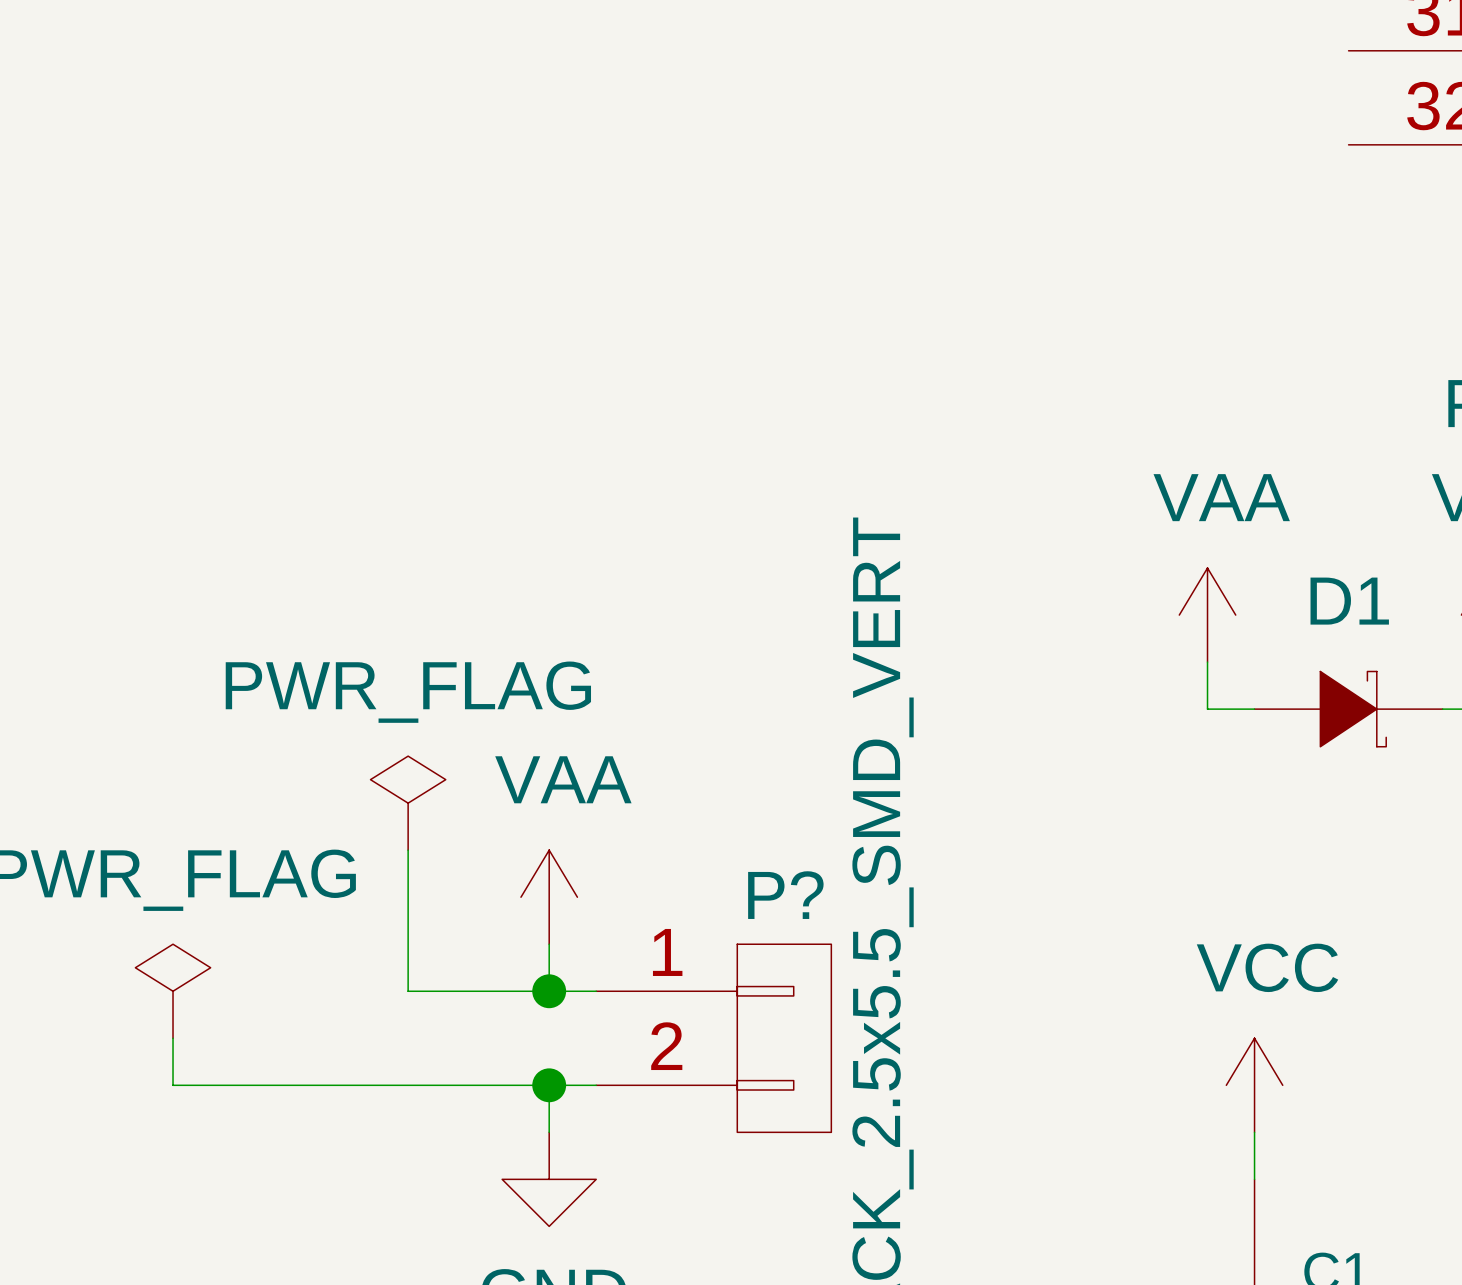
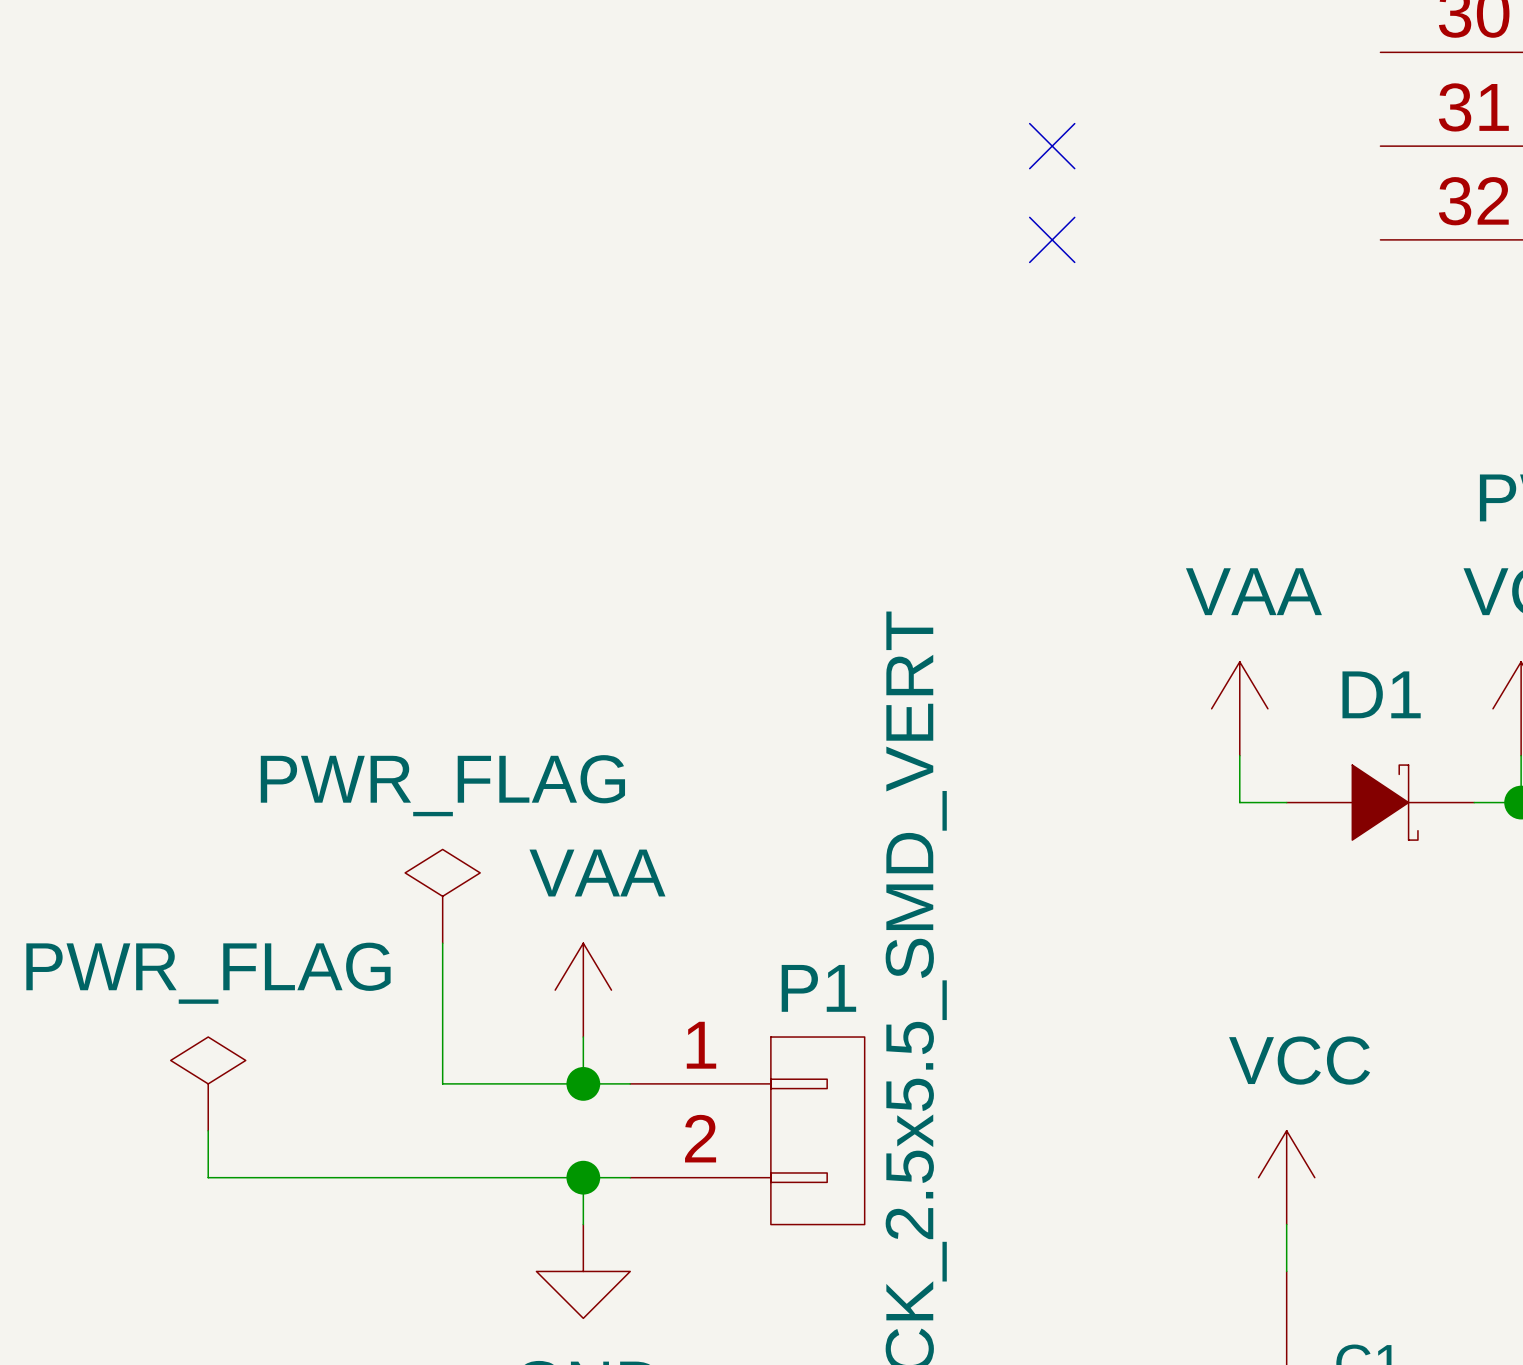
no-connect mark: none -> (1052, 146)
no-connect mark: none -> (1052, 239)
P? name: P? (785, 895) -> P1 (818, 988)

